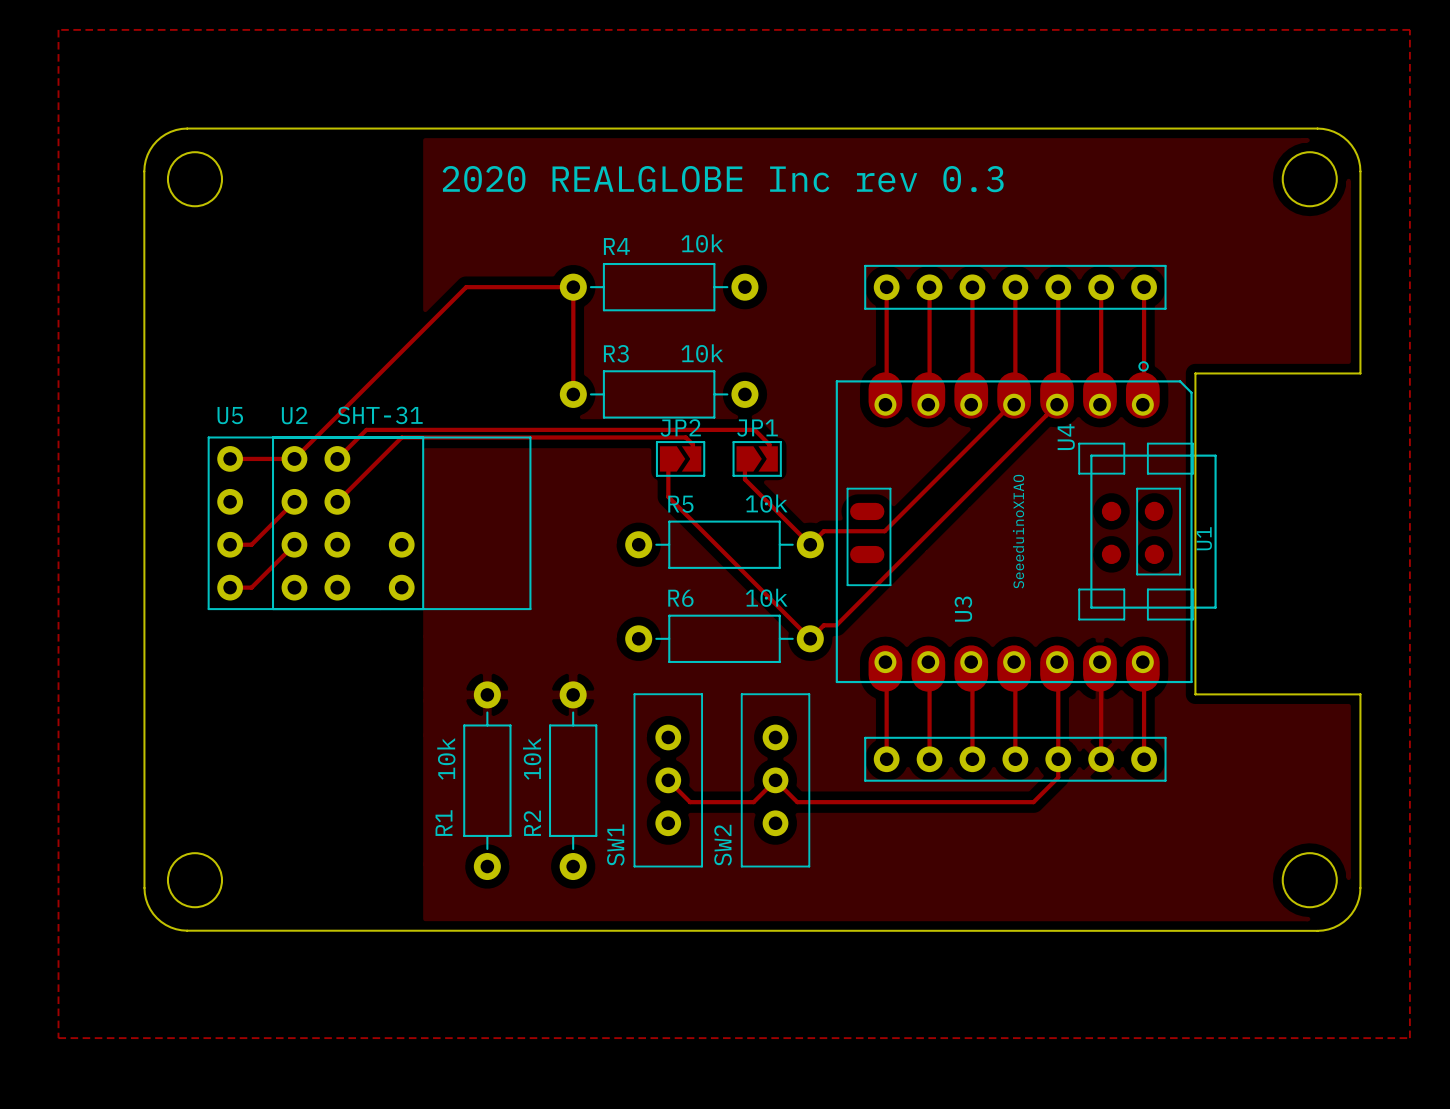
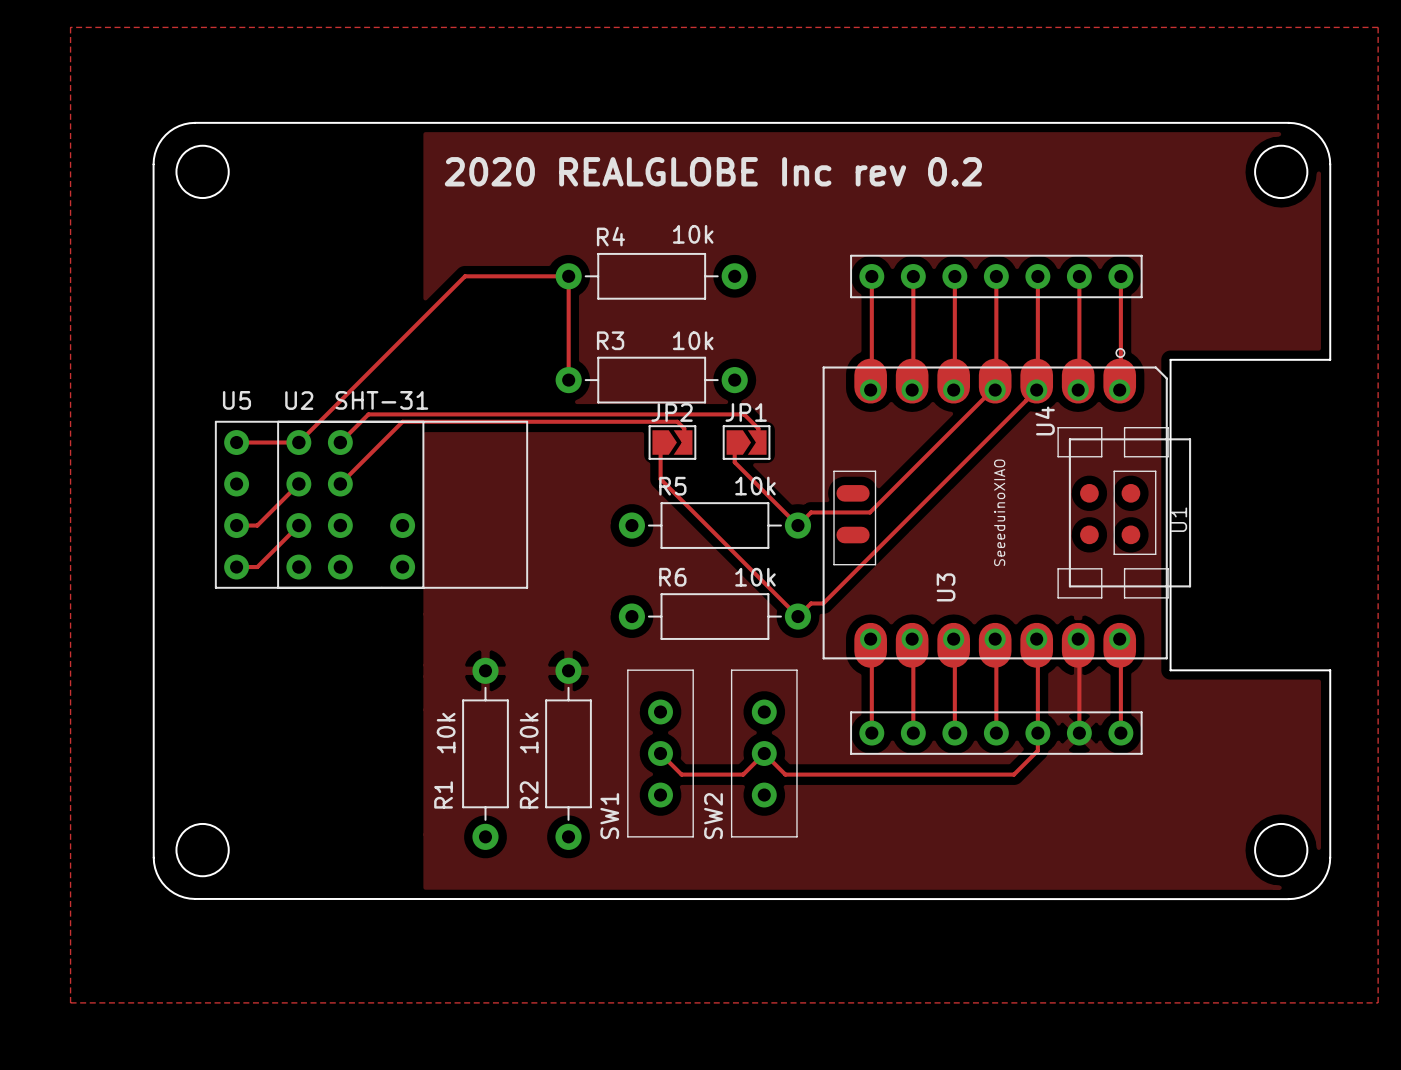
text: 2020 REALGLOBE Inc rev 0.3 (723, 179) -> 2020 REALGLOBE Inc rev 0.2 (713, 171)

